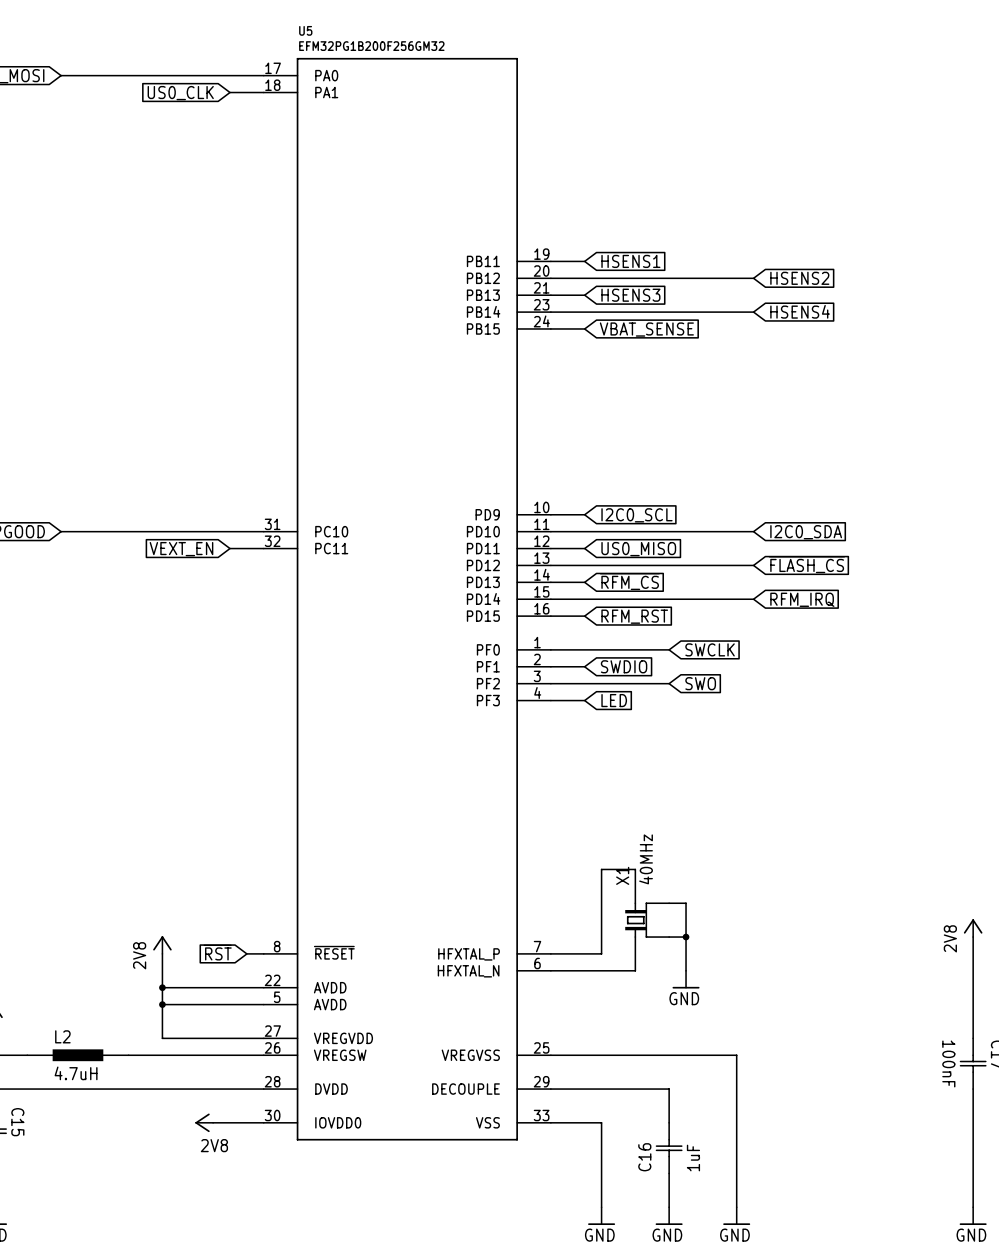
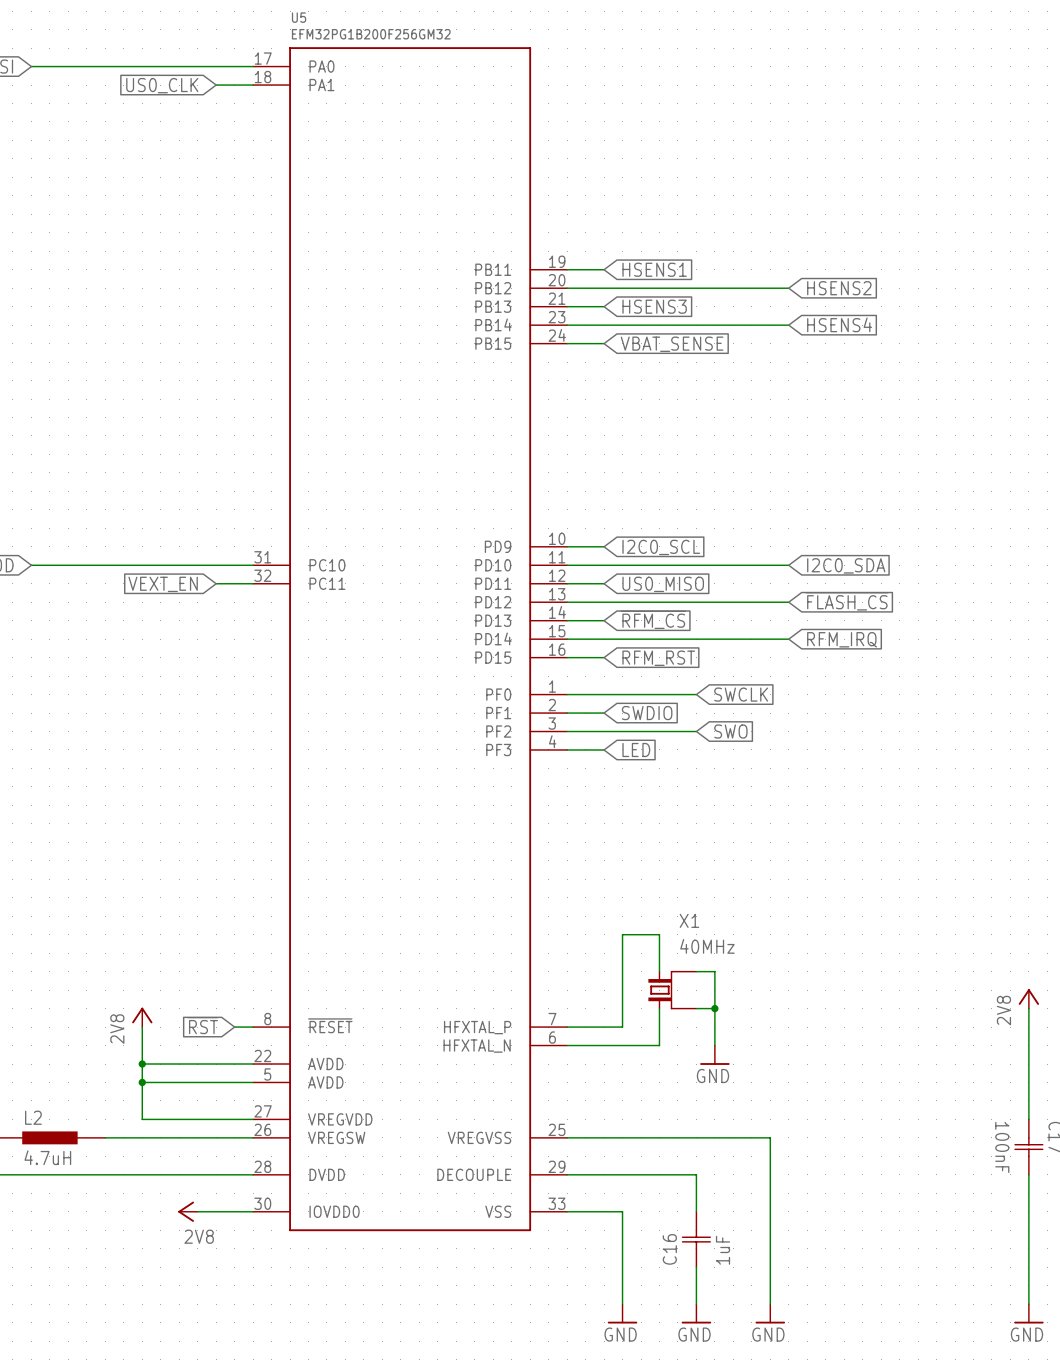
X1 value rotation: 0° (646, 859) -> 90° clockwise (707, 946)
X1 name rotation: 0° (622, 875) -> 90° clockwise (689, 920)
X1 name position: X1 (622, 875) -> X1 (689, 920)

